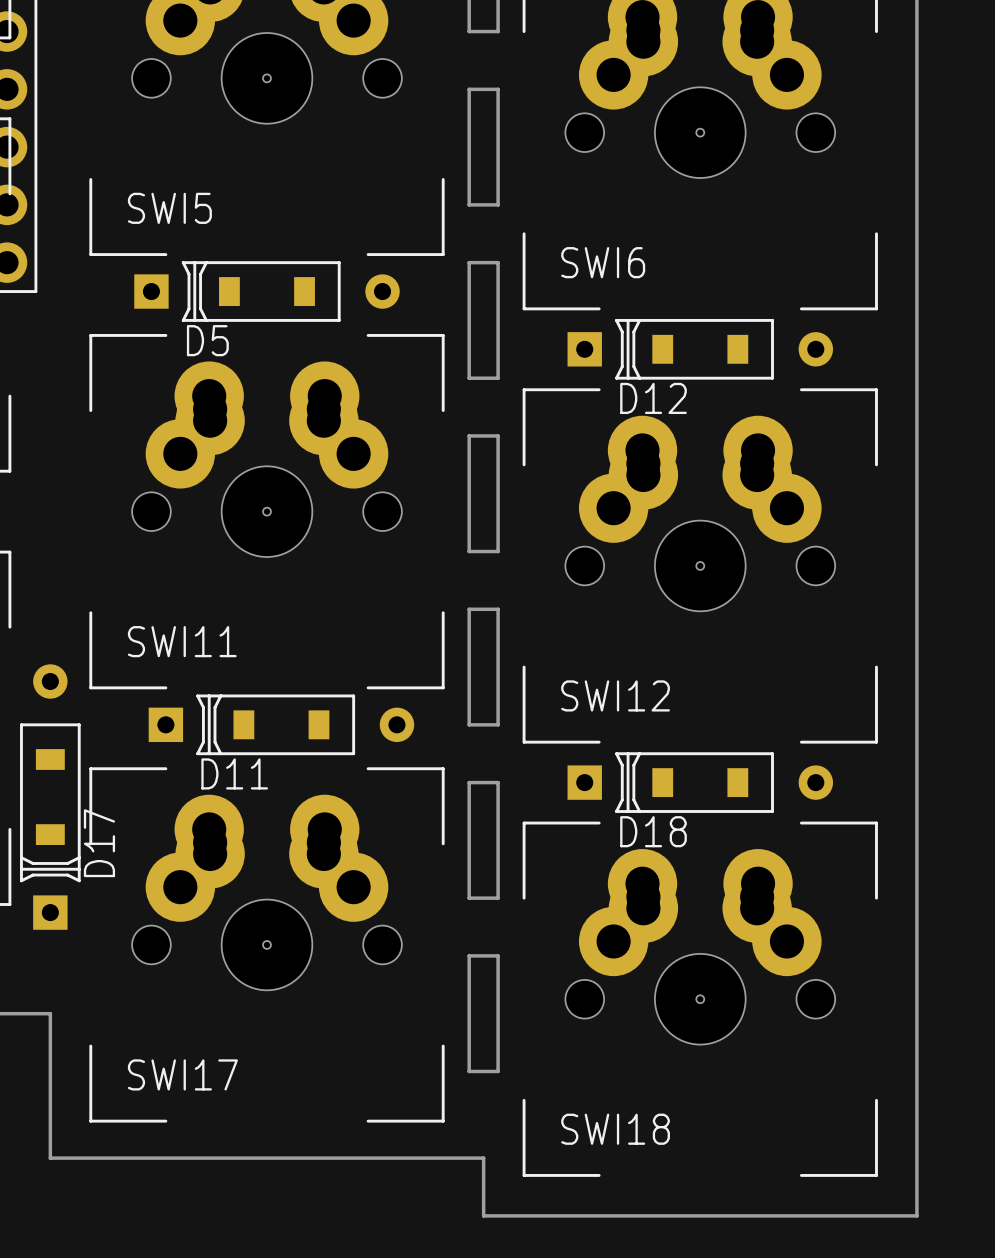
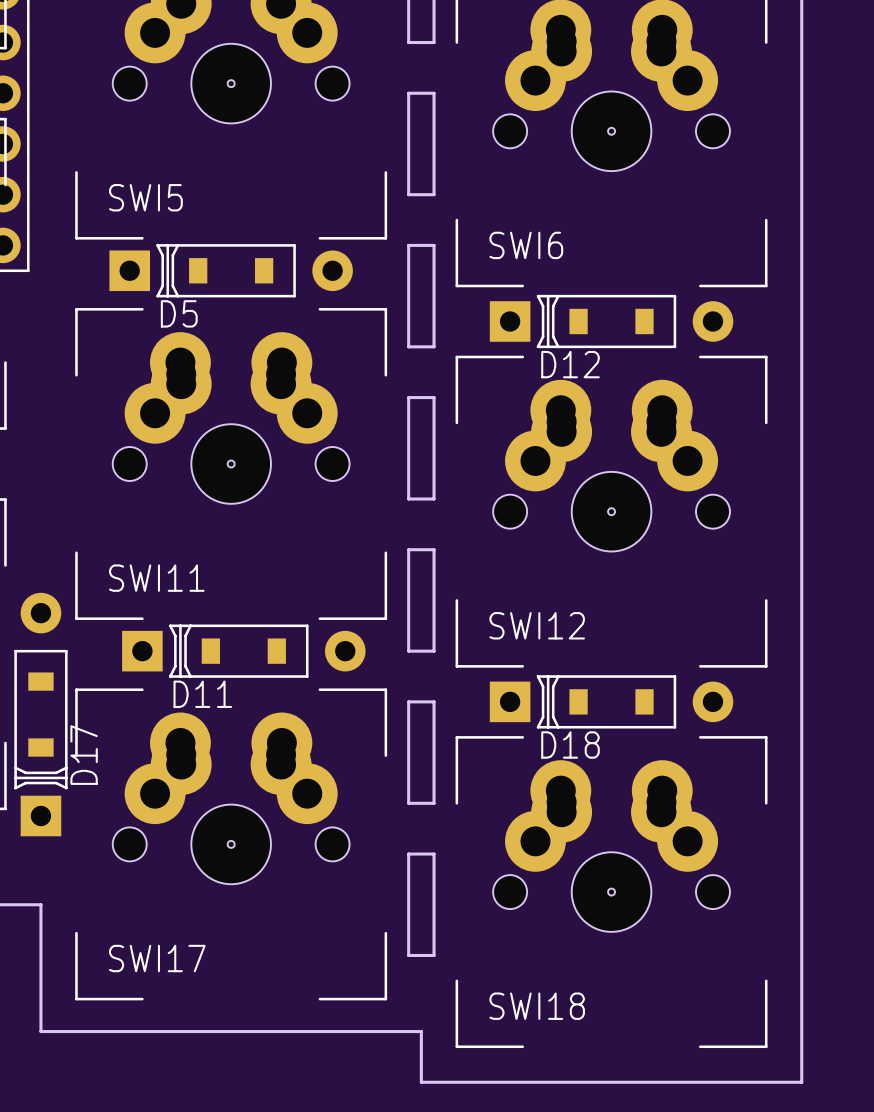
D5 footprint: [134, 261, 400, 322] -> [109, 244, 353, 298]
D12 footprint: [567, 318, 834, 380] -> [489, 294, 734, 349]
D17 footprint: [20, 664, 81, 930] -> [14, 592, 68, 837]
D11 footprint: [148, 694, 415, 756] -> [122, 624, 366, 678]
D18 footprint: [567, 752, 834, 813] -> [489, 675, 734, 729]

